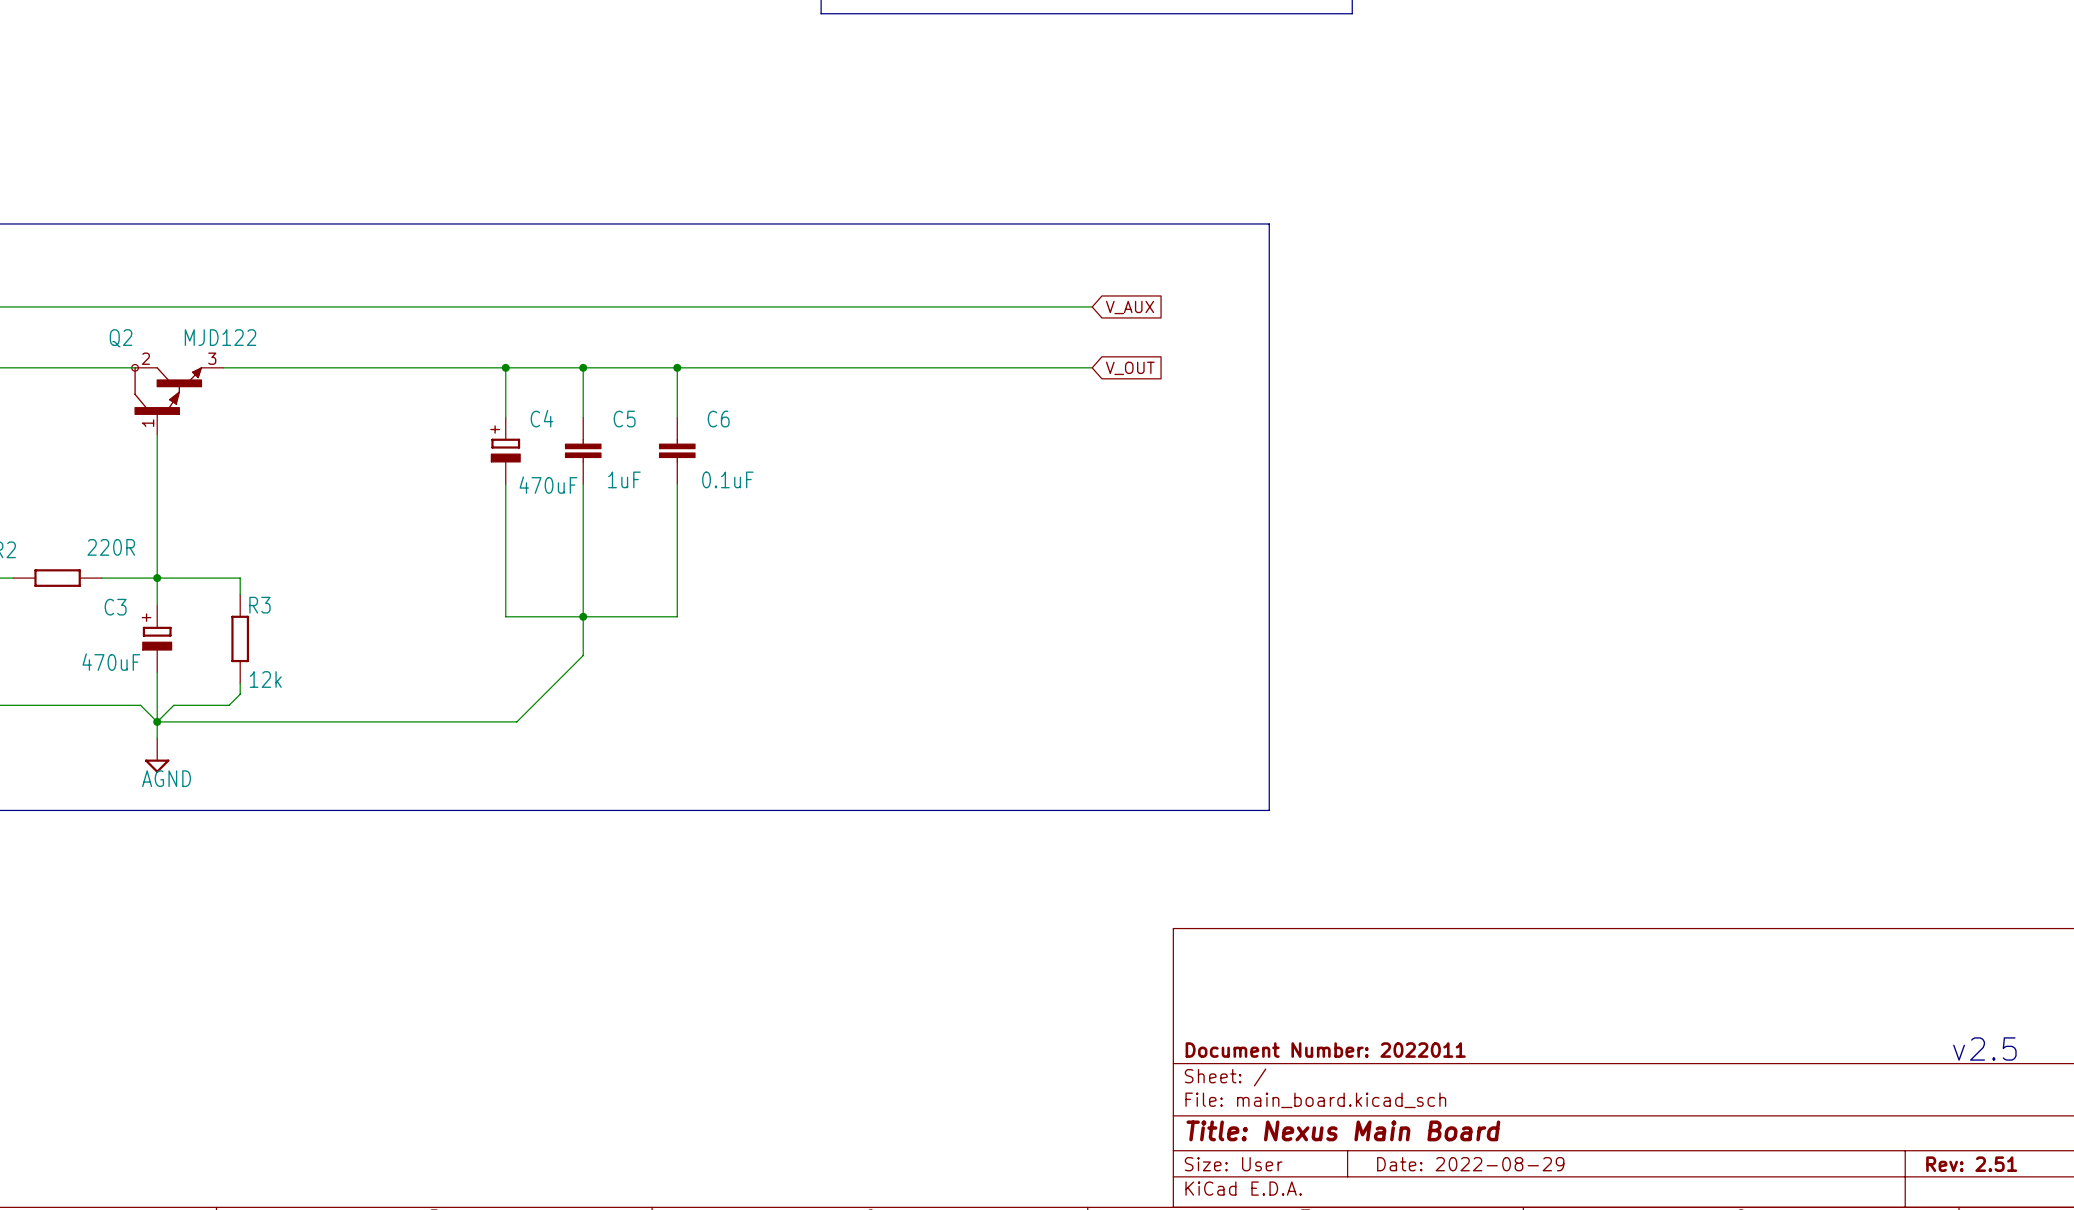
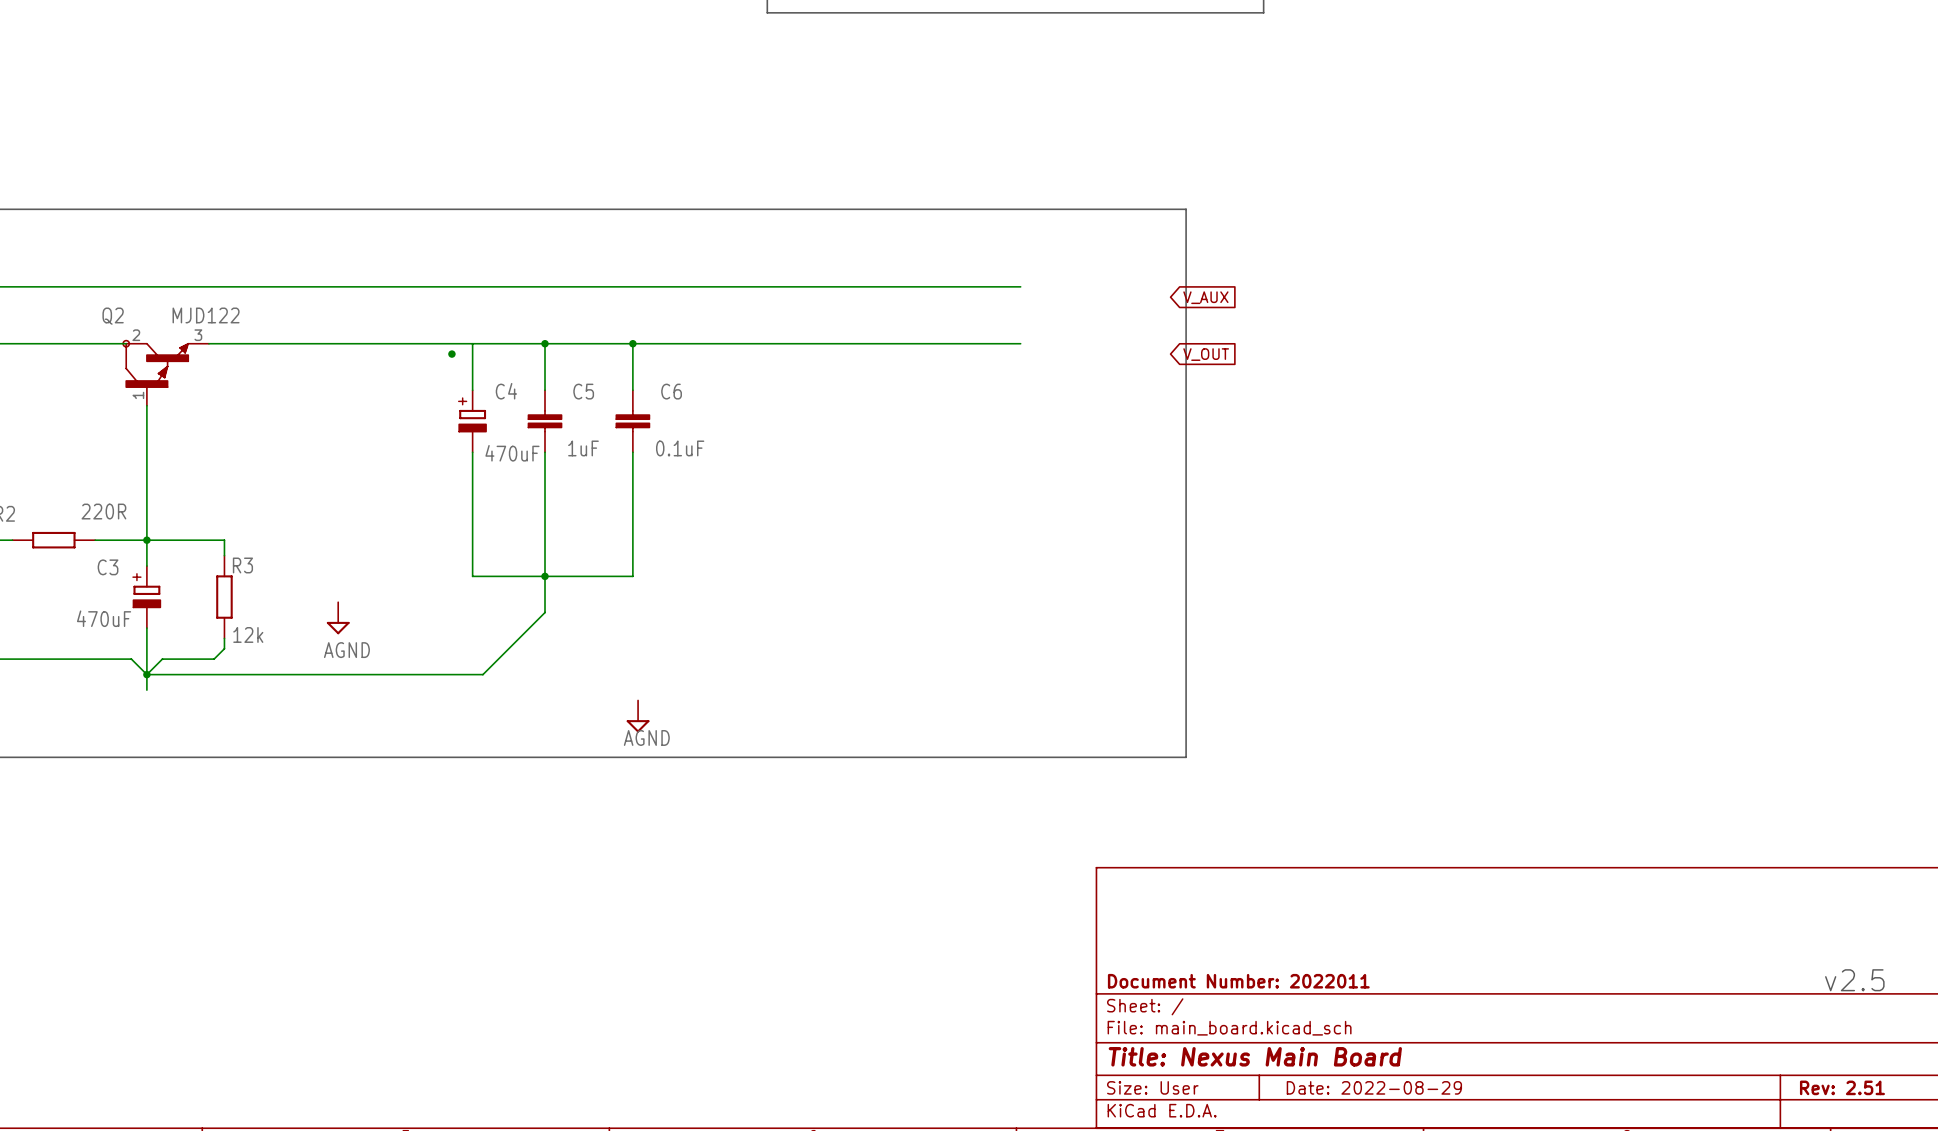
global label position: V_AUX (1130, 307) -> V_AUX (1205, 297)
junction position: (505, 367) -> (451, 354)
global label position: V_OUT (1130, 368) -> V_OUT (1206, 354)
power symbol: none -> AGND (338, 618)
power symbol: AGND (157, 755) -> none
power symbol: none -> AGND (638, 716)

